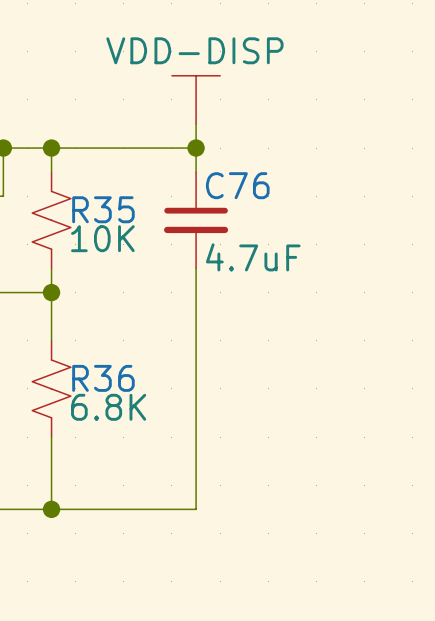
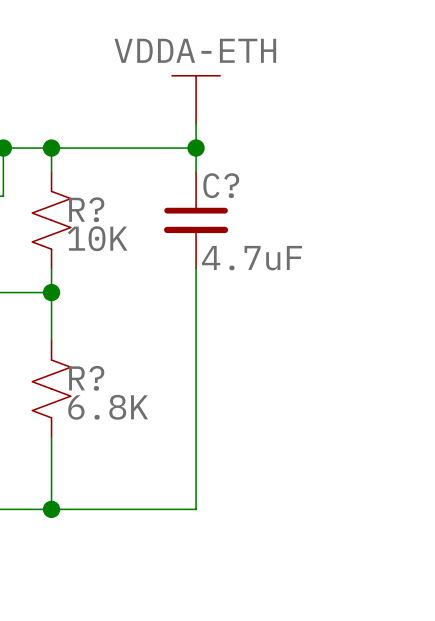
power symbol: VDD-DISP (196, 99) -> VDDA-ETH (196, 99)
C76 name: C76 (237, 185) -> C? (221, 185)
R35 name: R35 (103, 209) -> R? (86, 209)
R36 name: R36 (103, 378) -> R? (86, 378)

